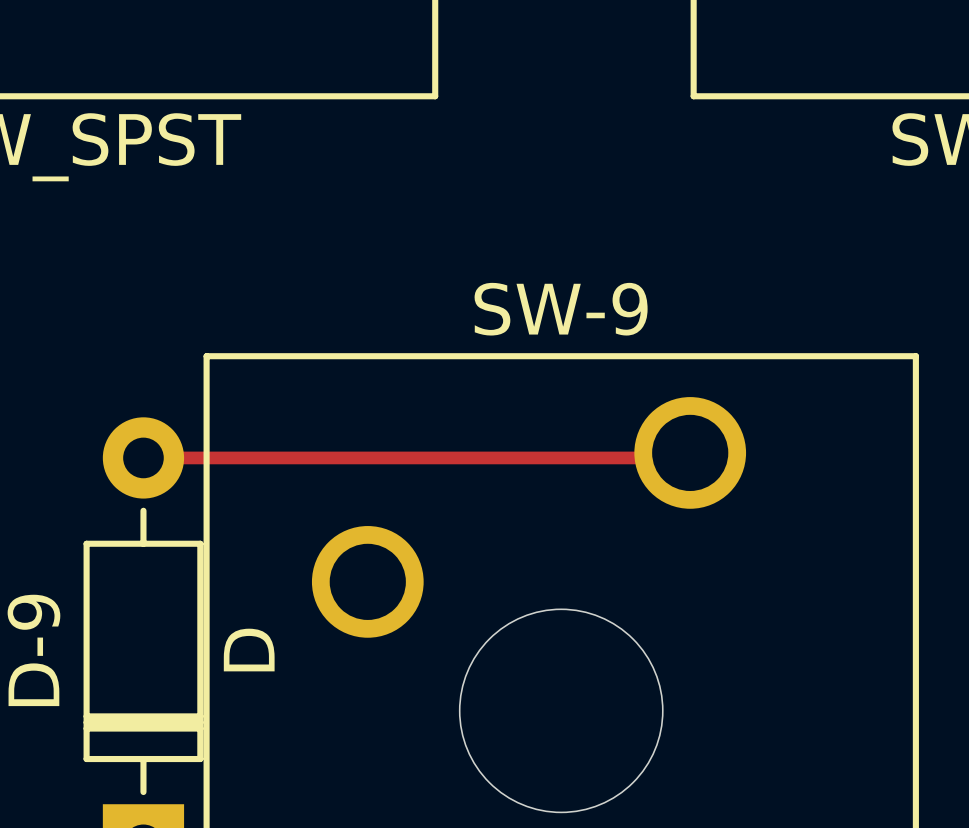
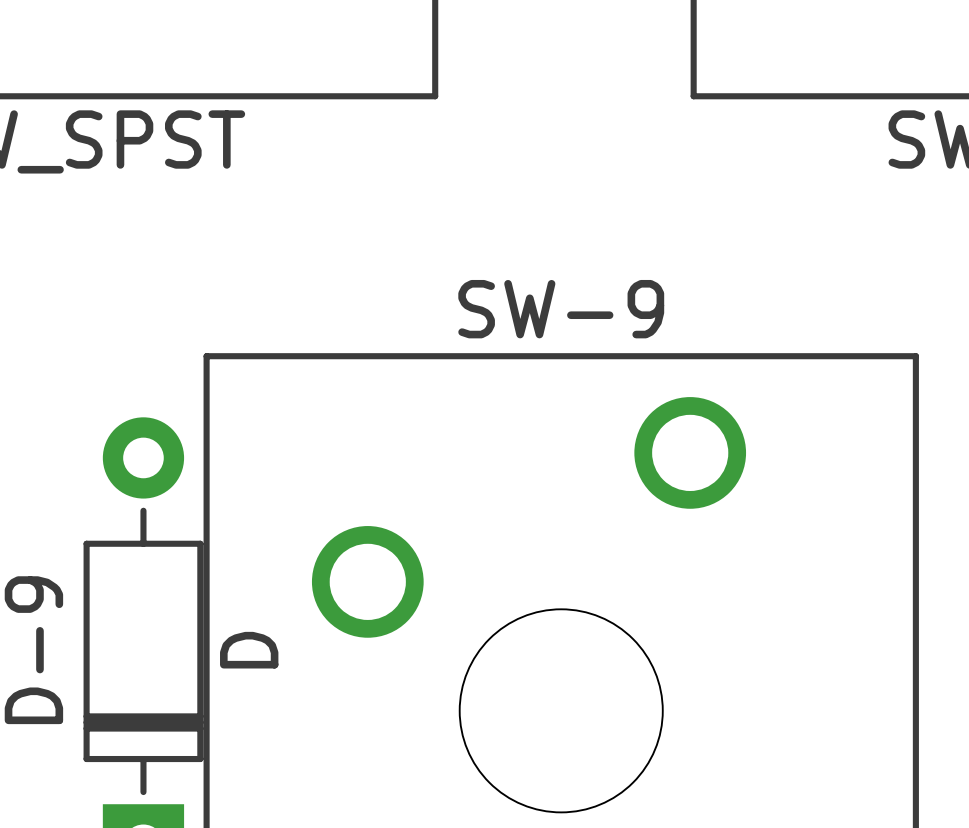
track: (690, 452) (685, 457) (143, 457) -> none

